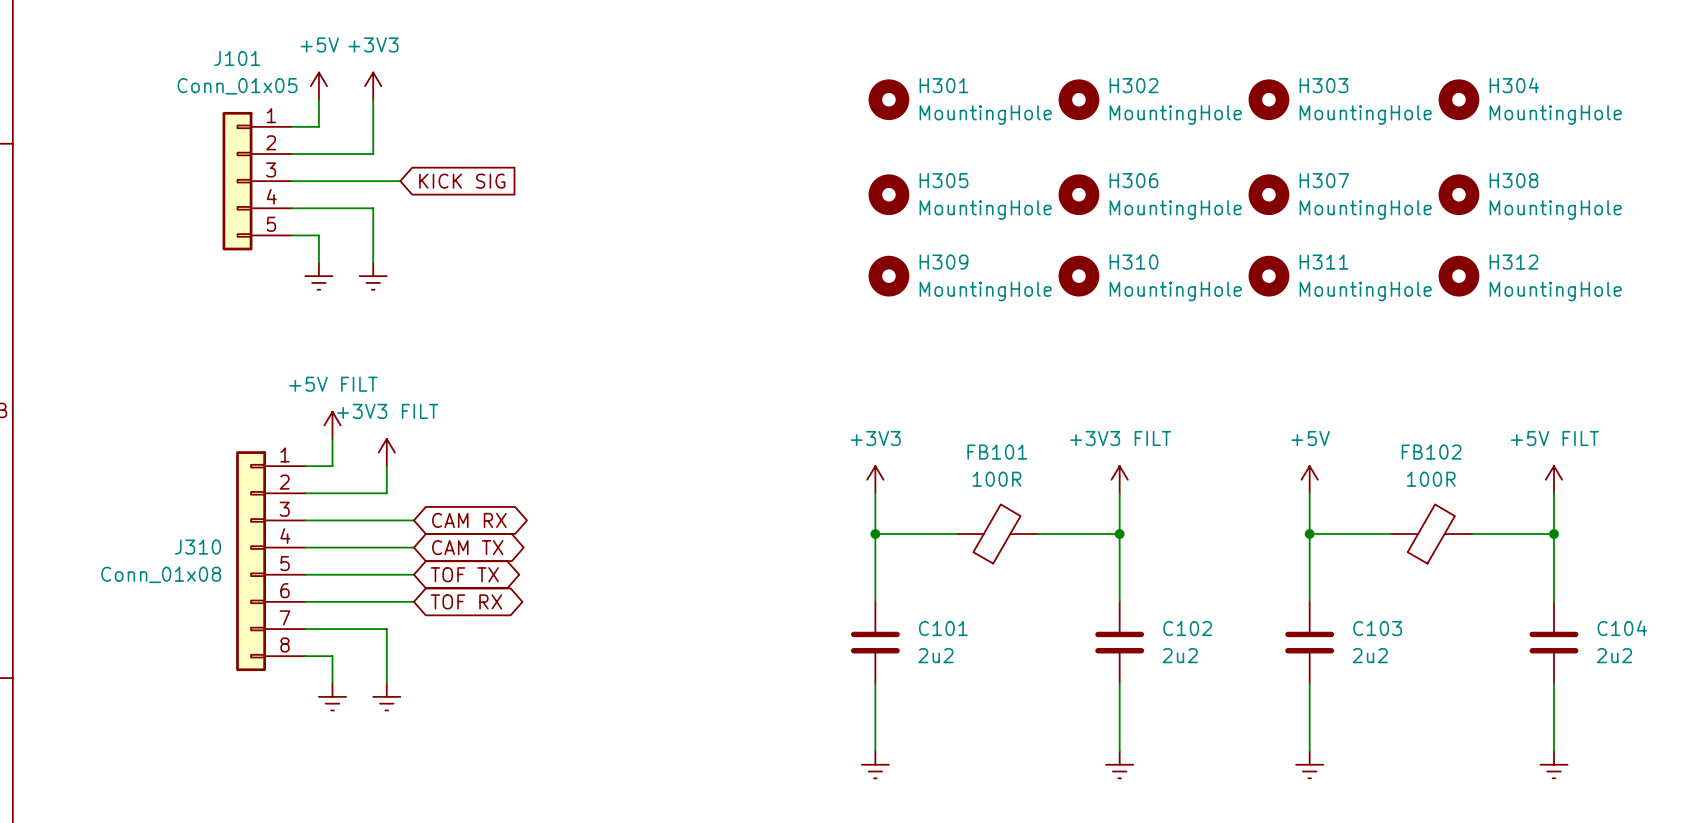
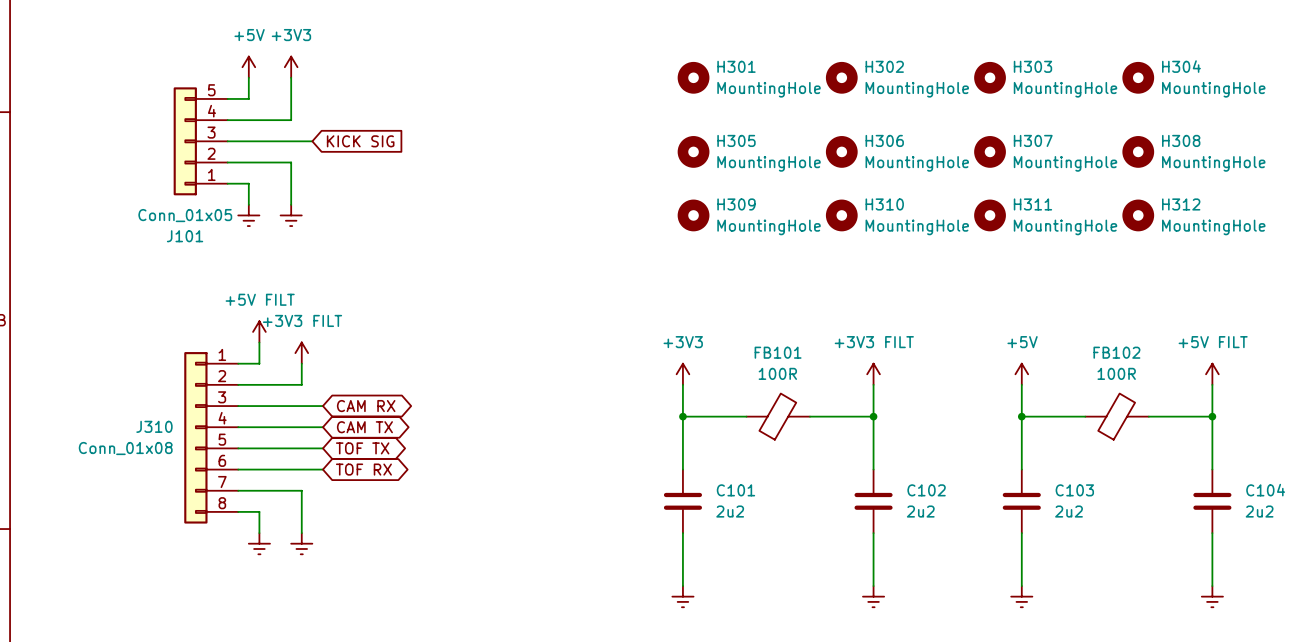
J101 flip: as is (237, 181) -> up-down (185, 141)

